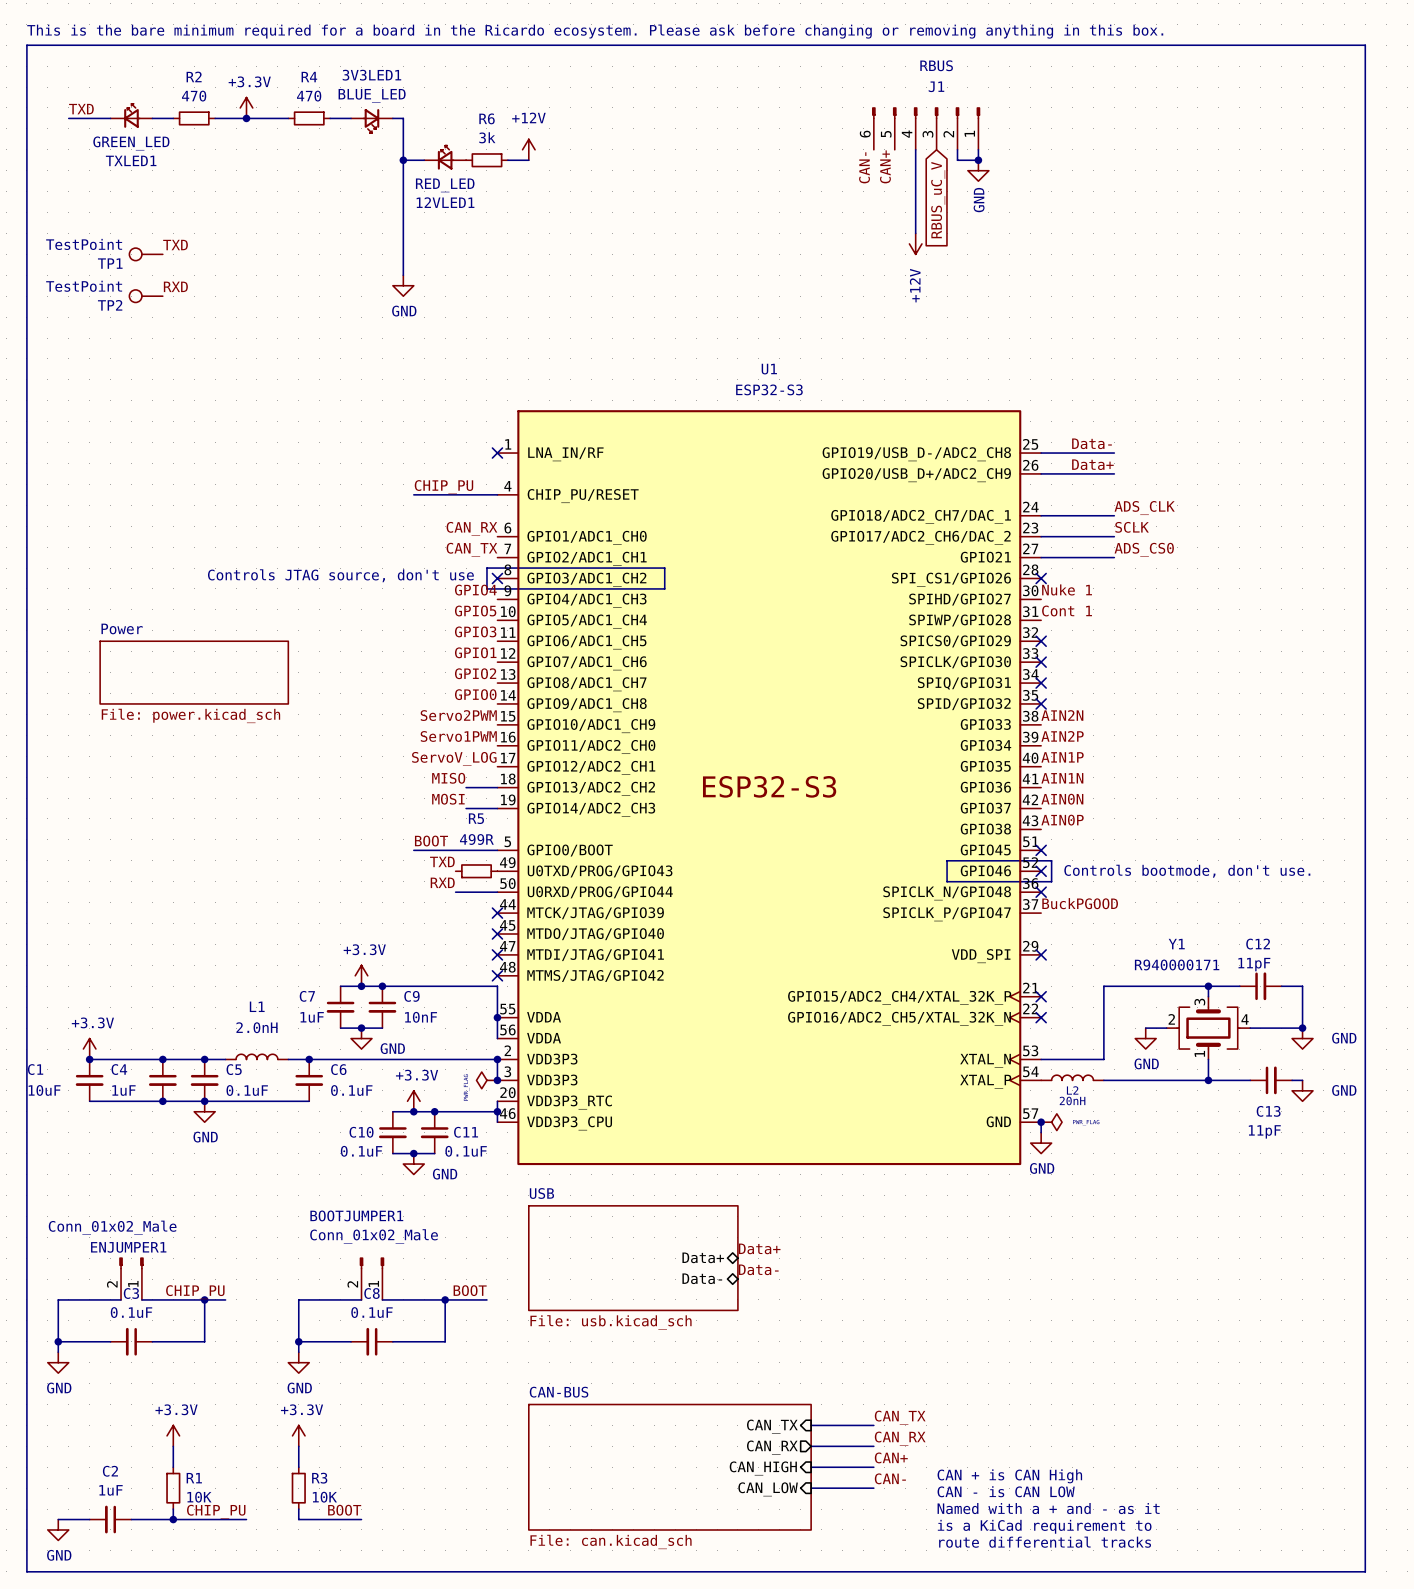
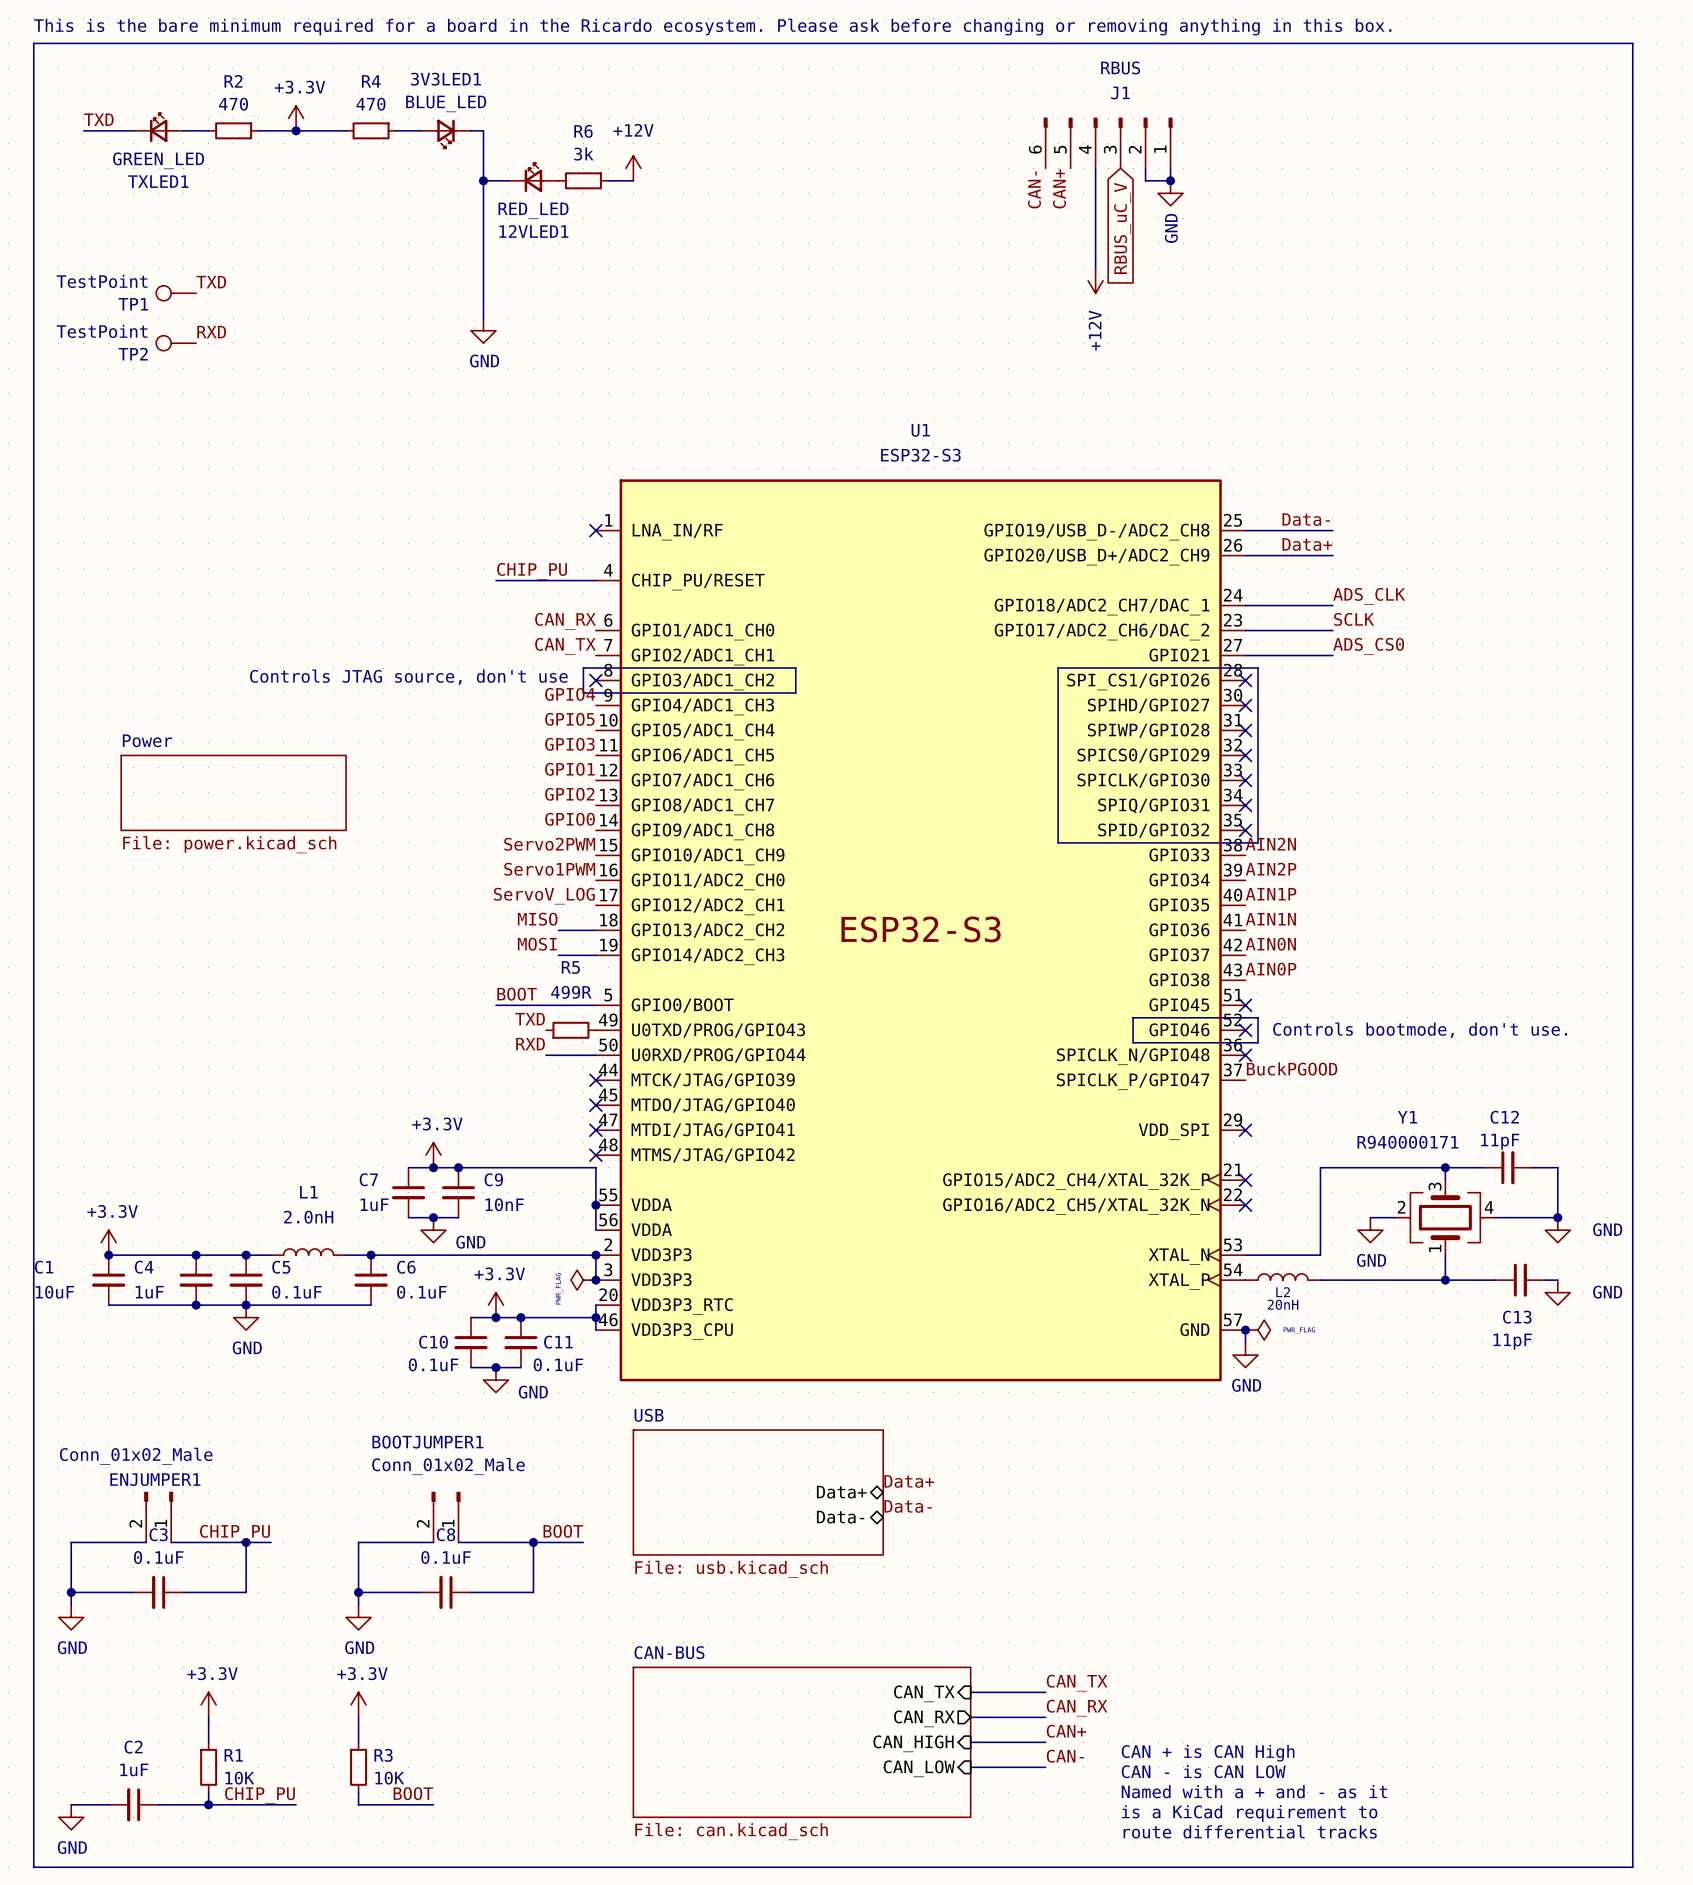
line: none -> (1058, 668) (1058, 842) (1257, 842) (1257, 668) (1058, 668)
label: Nuke 1 (1067, 589) -> none
no-connect mark: none -> (1245, 705)
label: Cont 1 (1067, 611) -> none
no-connect mark: none -> (1245, 730)

